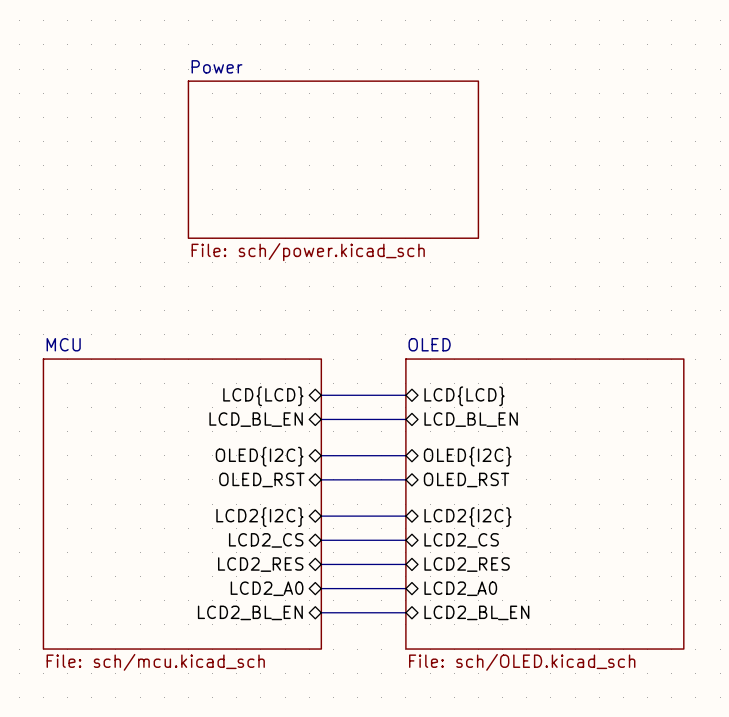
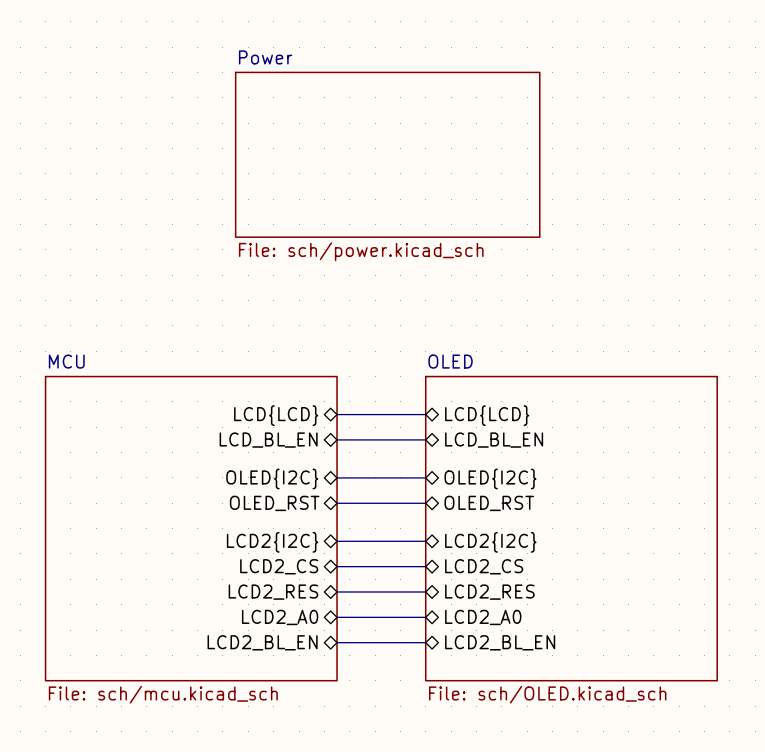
sheet Power position: (333, 159) -> (387, 154)

